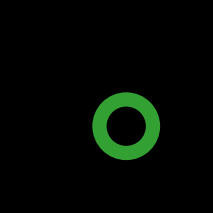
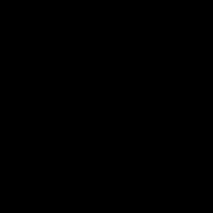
part: (126, 126) -> none

